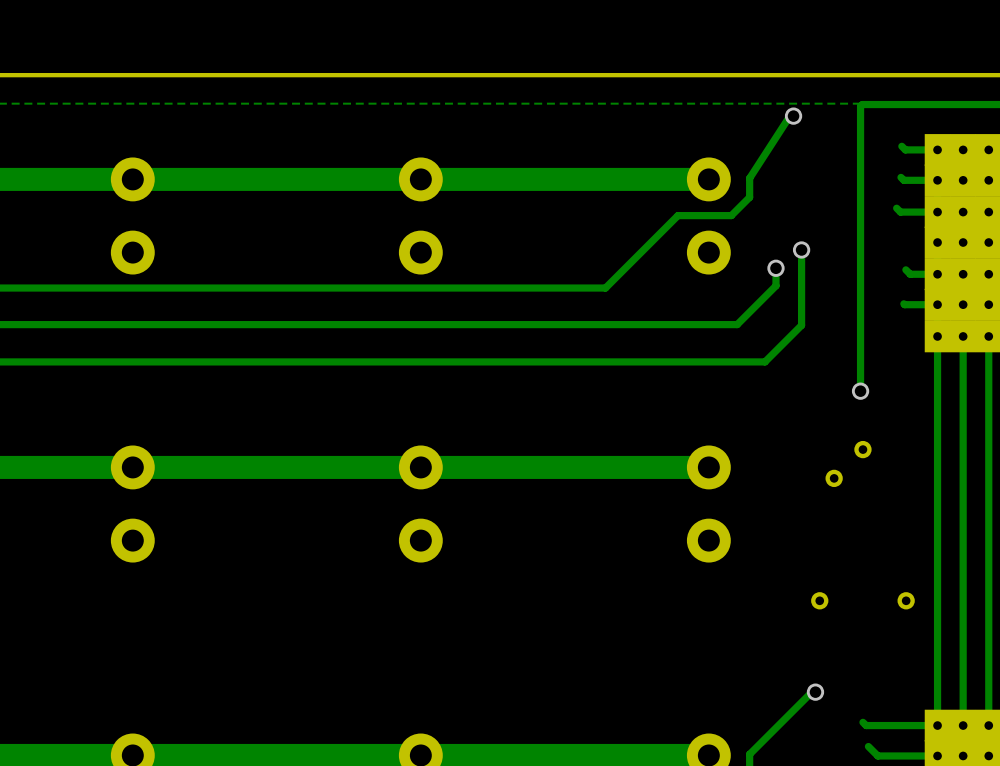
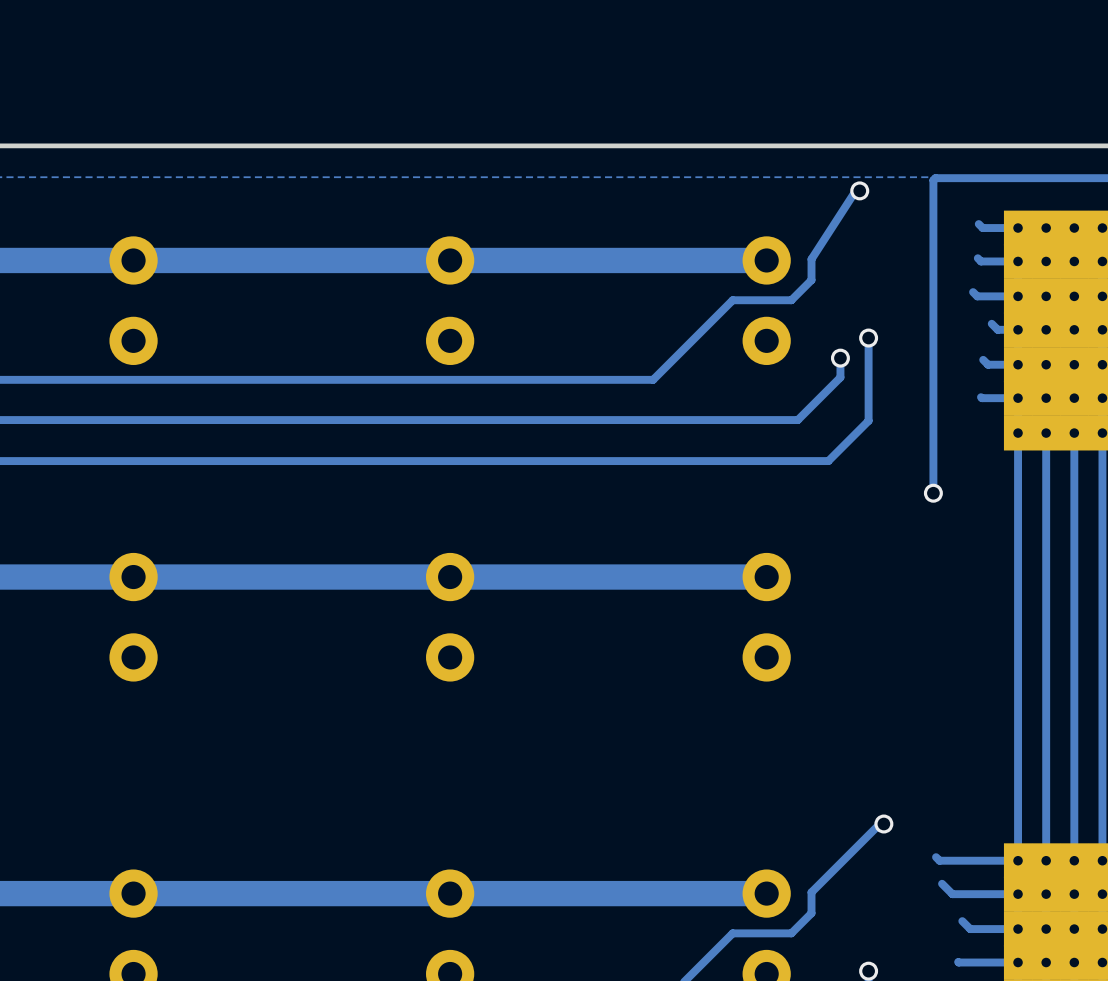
track: none -> (991, 323) (997, 329) (1018, 329)
part: (862, 449) -> none
part: (834, 478) -> none
part: (819, 600) -> none
part: (906, 600) -> none

